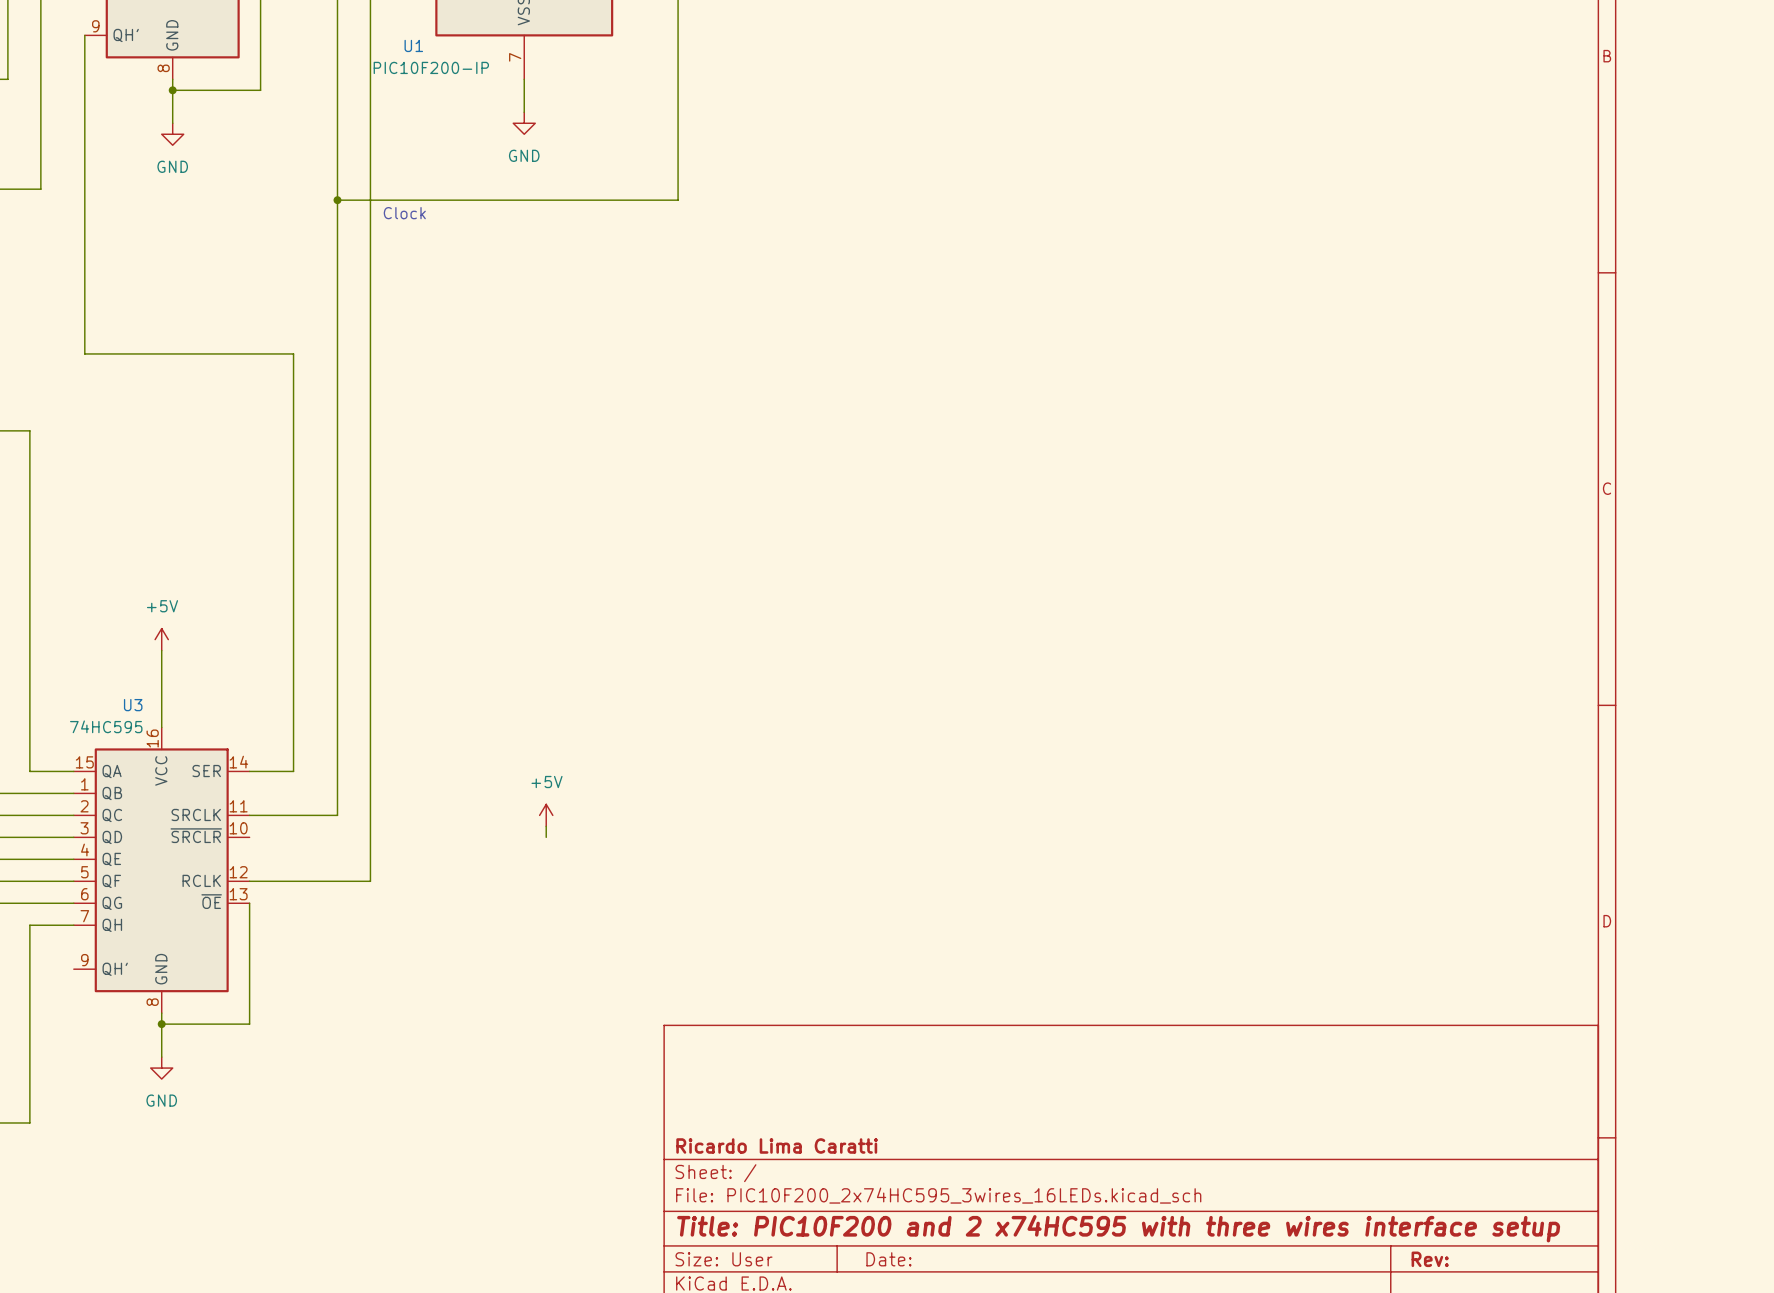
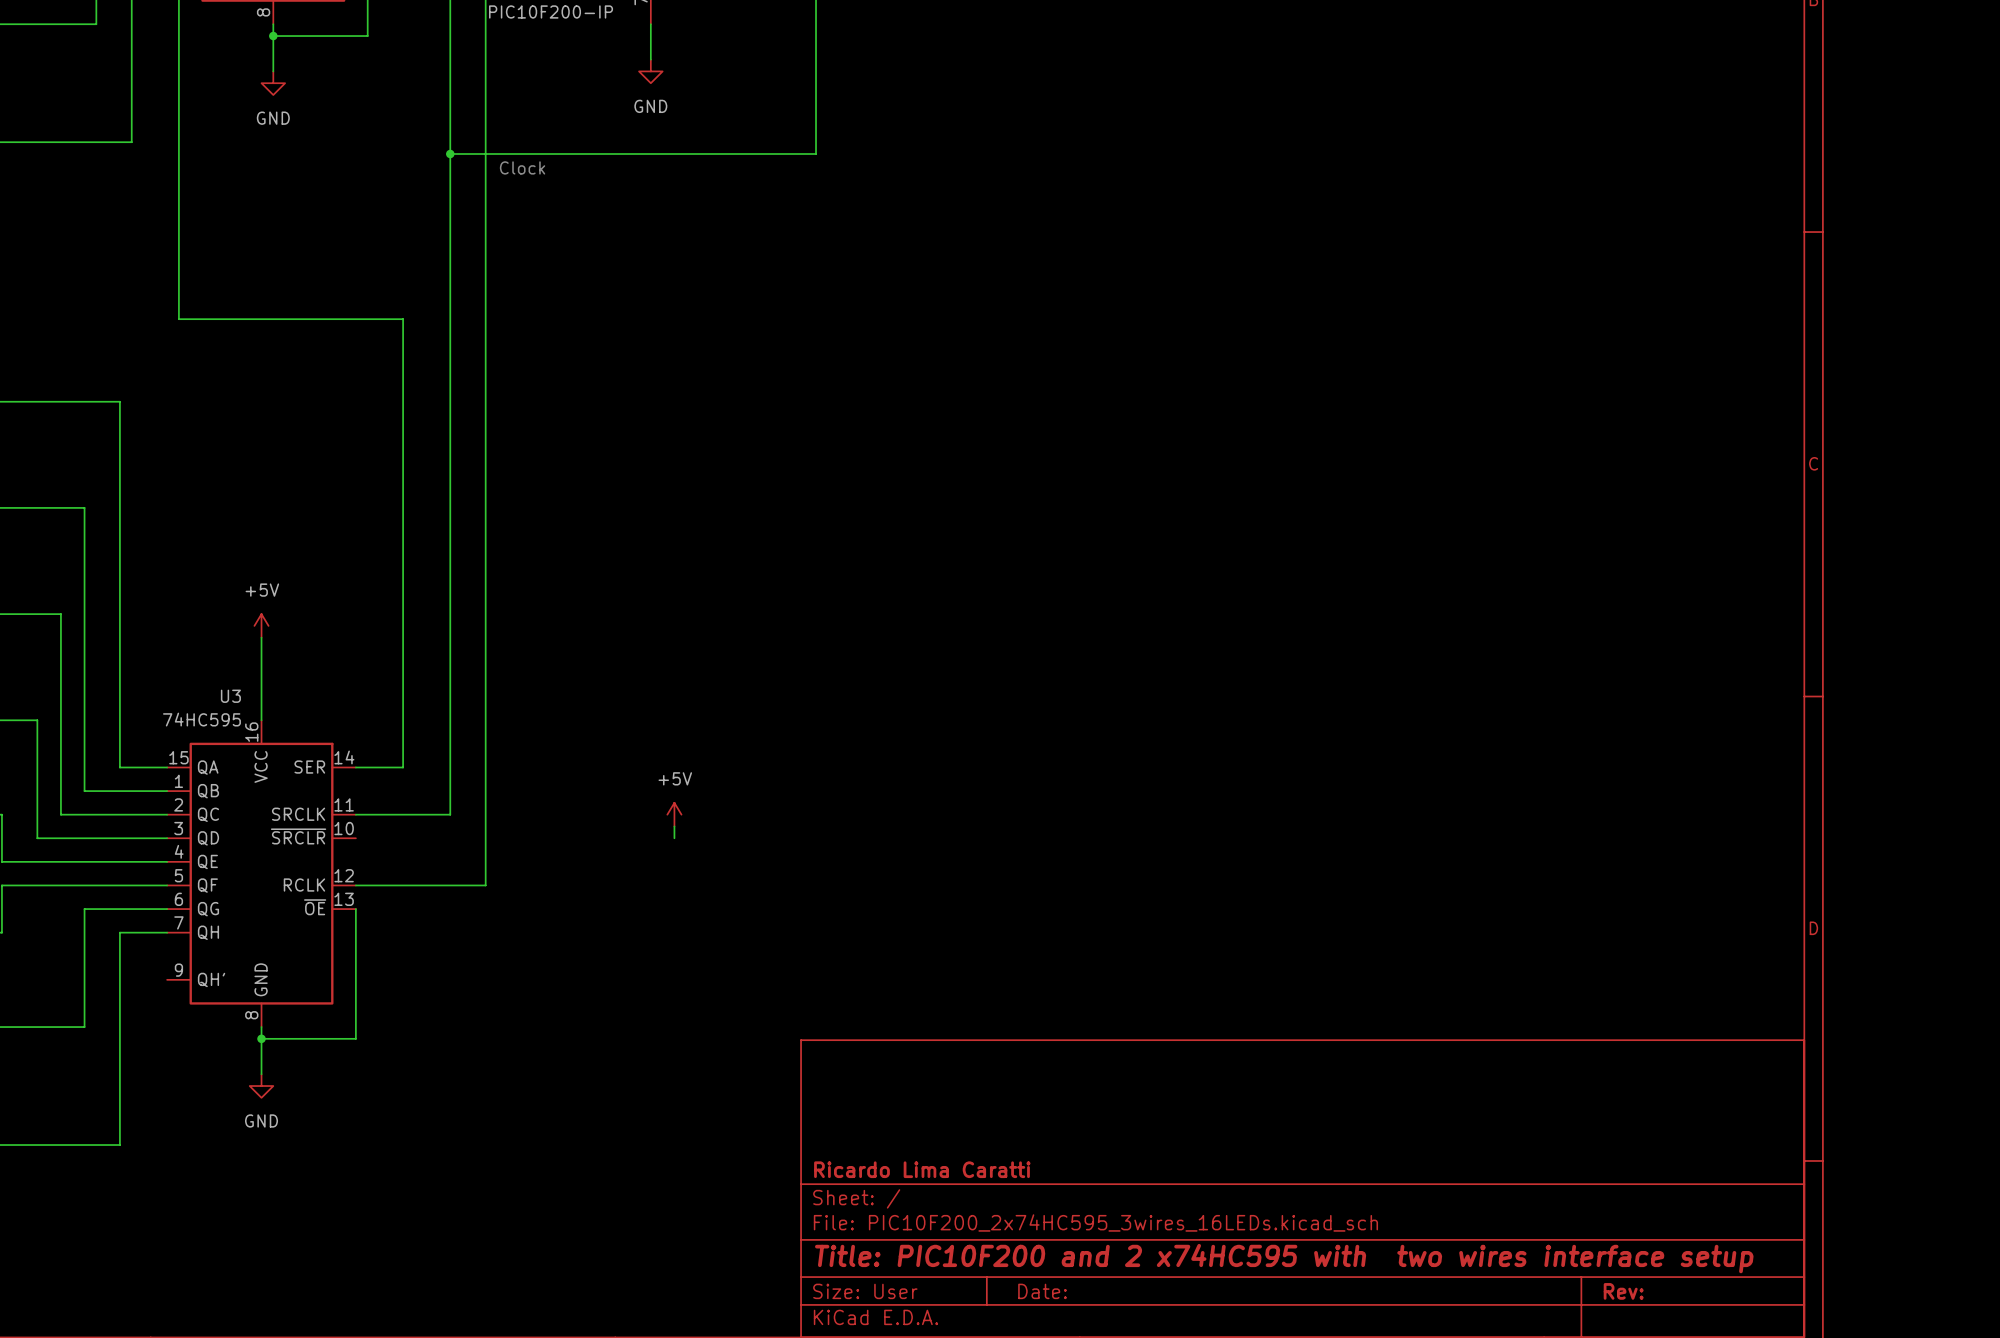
title block: Title: PIC10F200 and 2 x74HC595 with three wires interface setup (1118, 1228) -> Title: PIC10F200 and 2 x74HC595 with two wires interface setup (1284, 1258)

